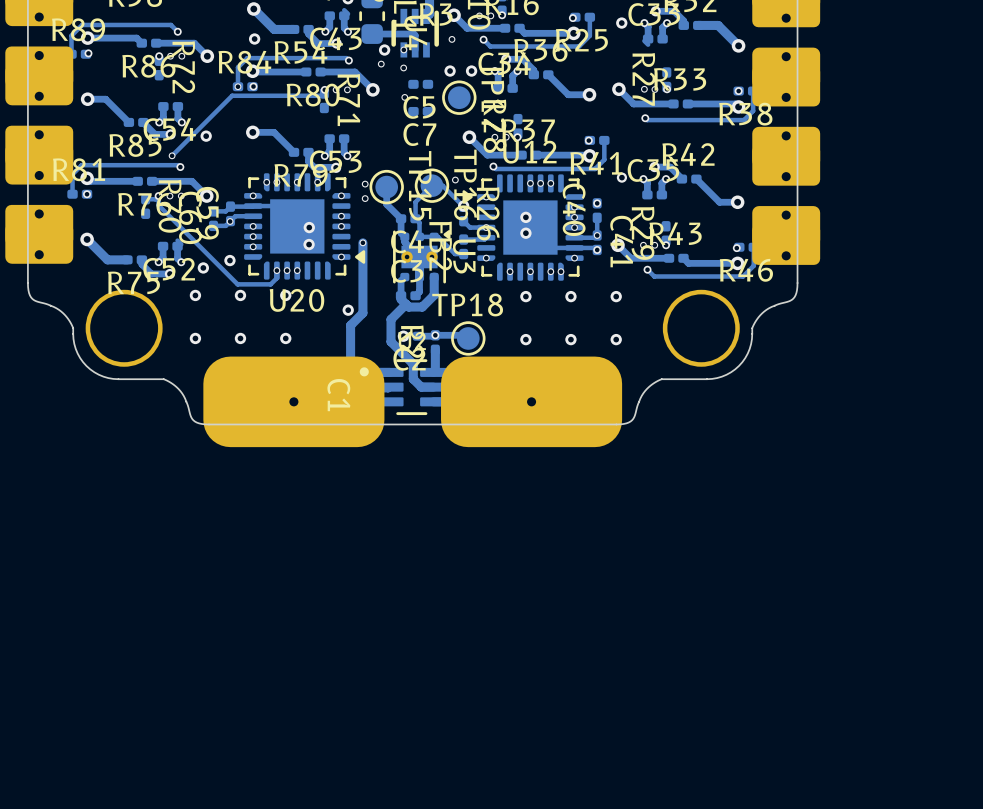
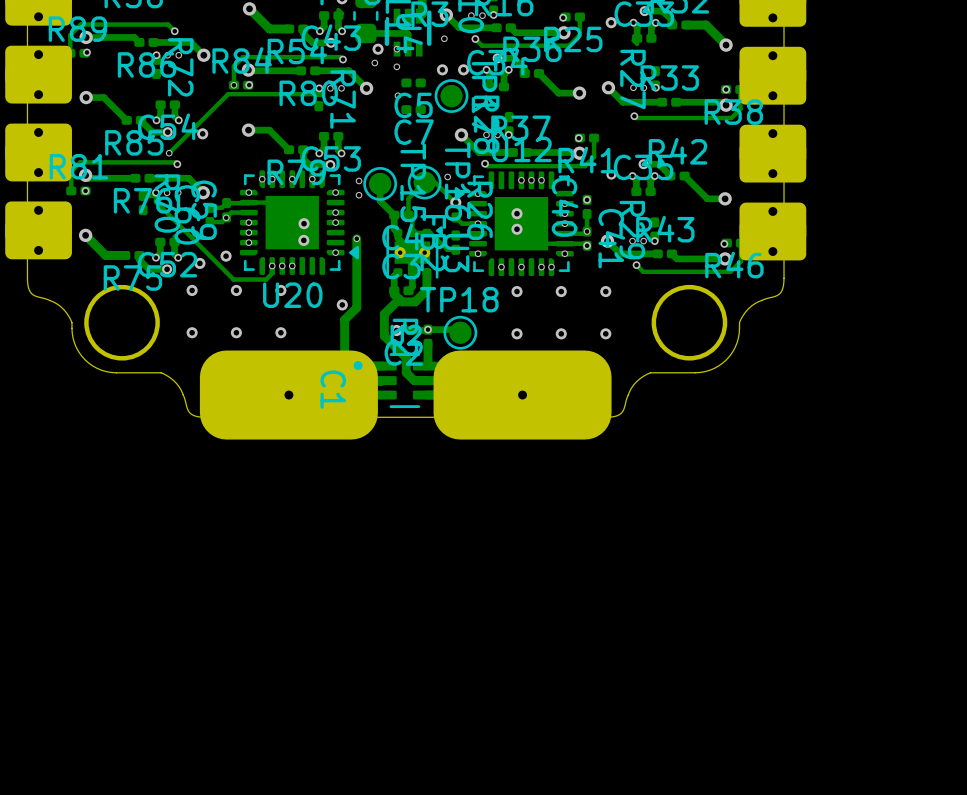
via: (254, 39) -> none

